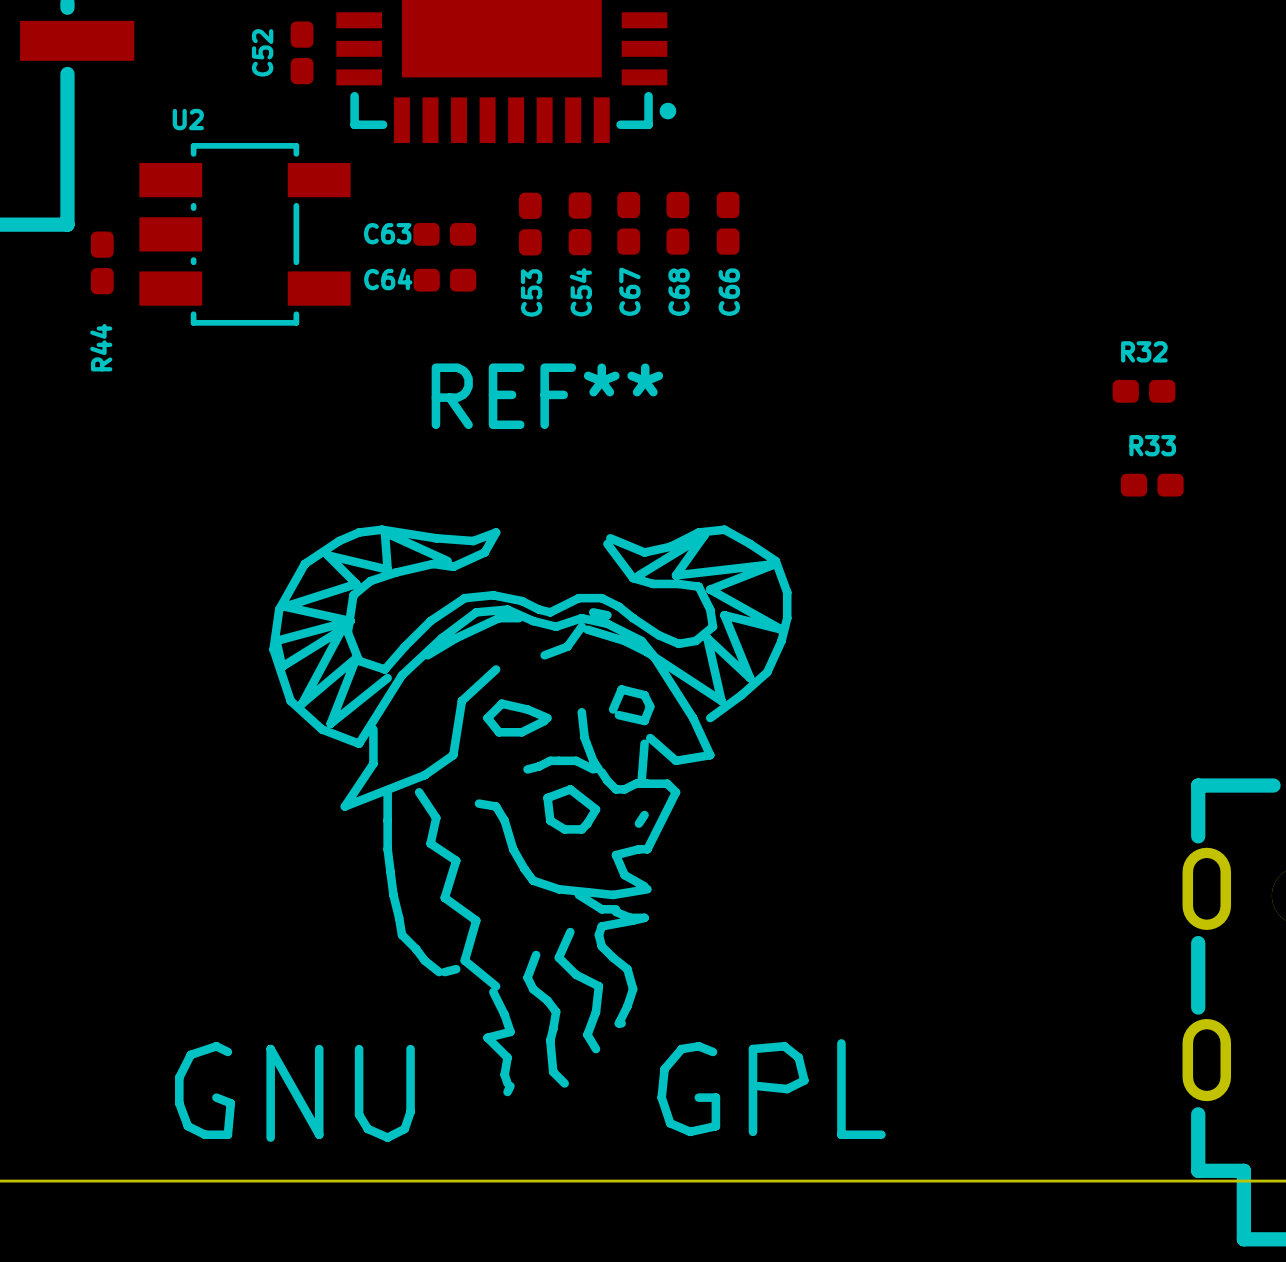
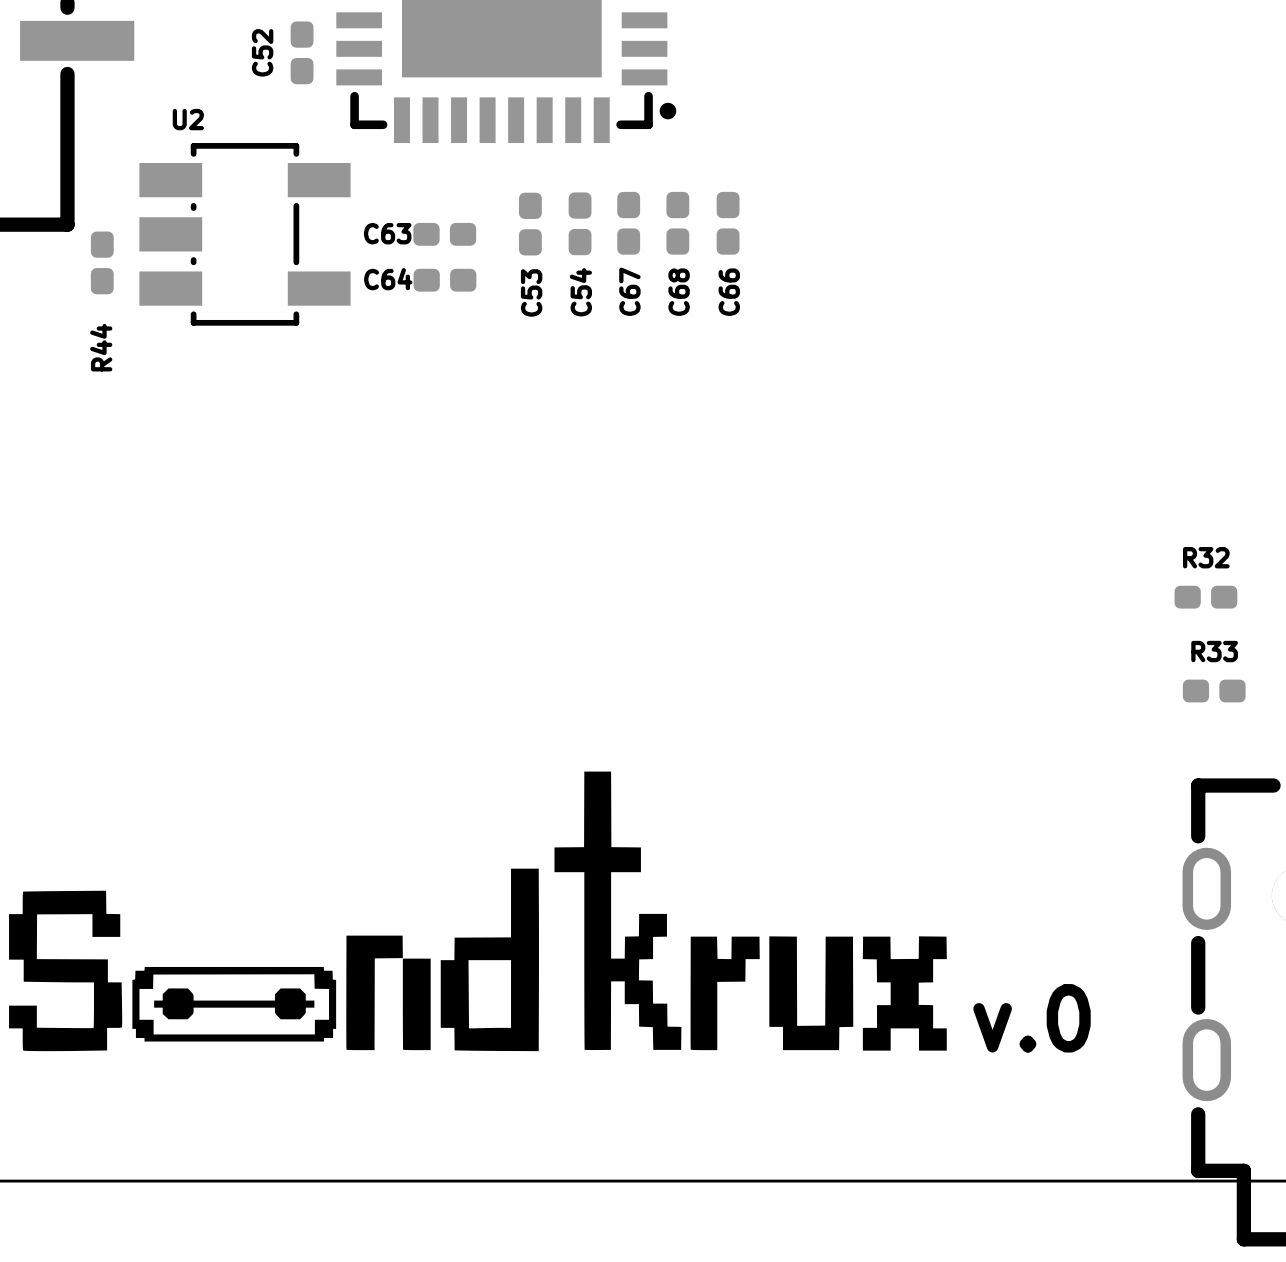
R32 position: (1143, 391) -> (1205, 597)
R33 position: (1152, 485) -> (1214, 690)
drawing: none -> [9, 771, 947, 1052]
REF**: (530, 833) -> none
text: none -> v.0 (1032, 1018)

